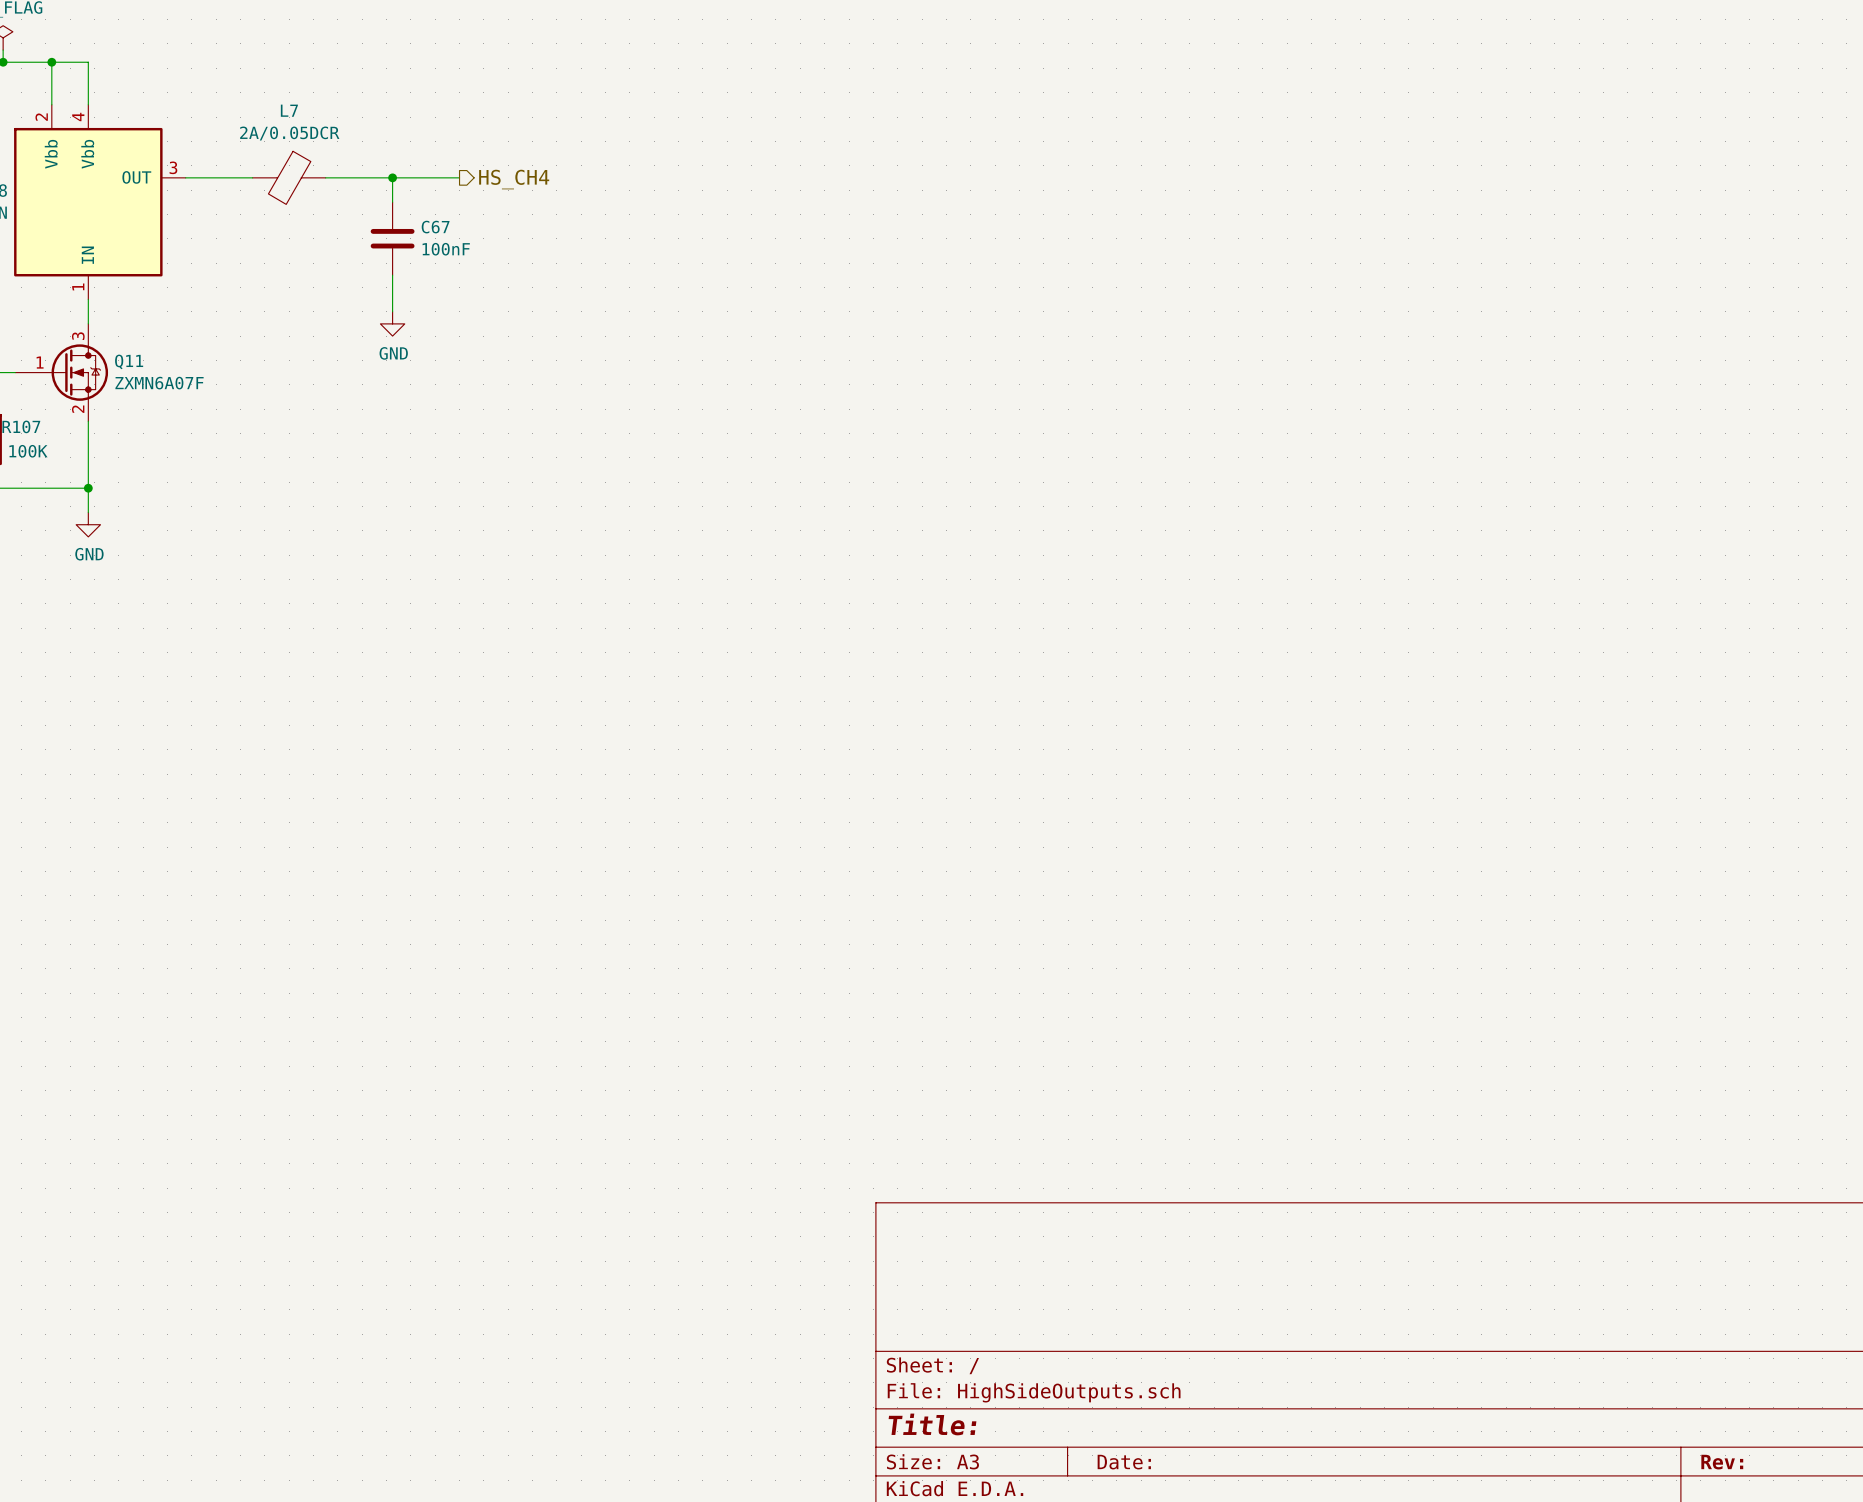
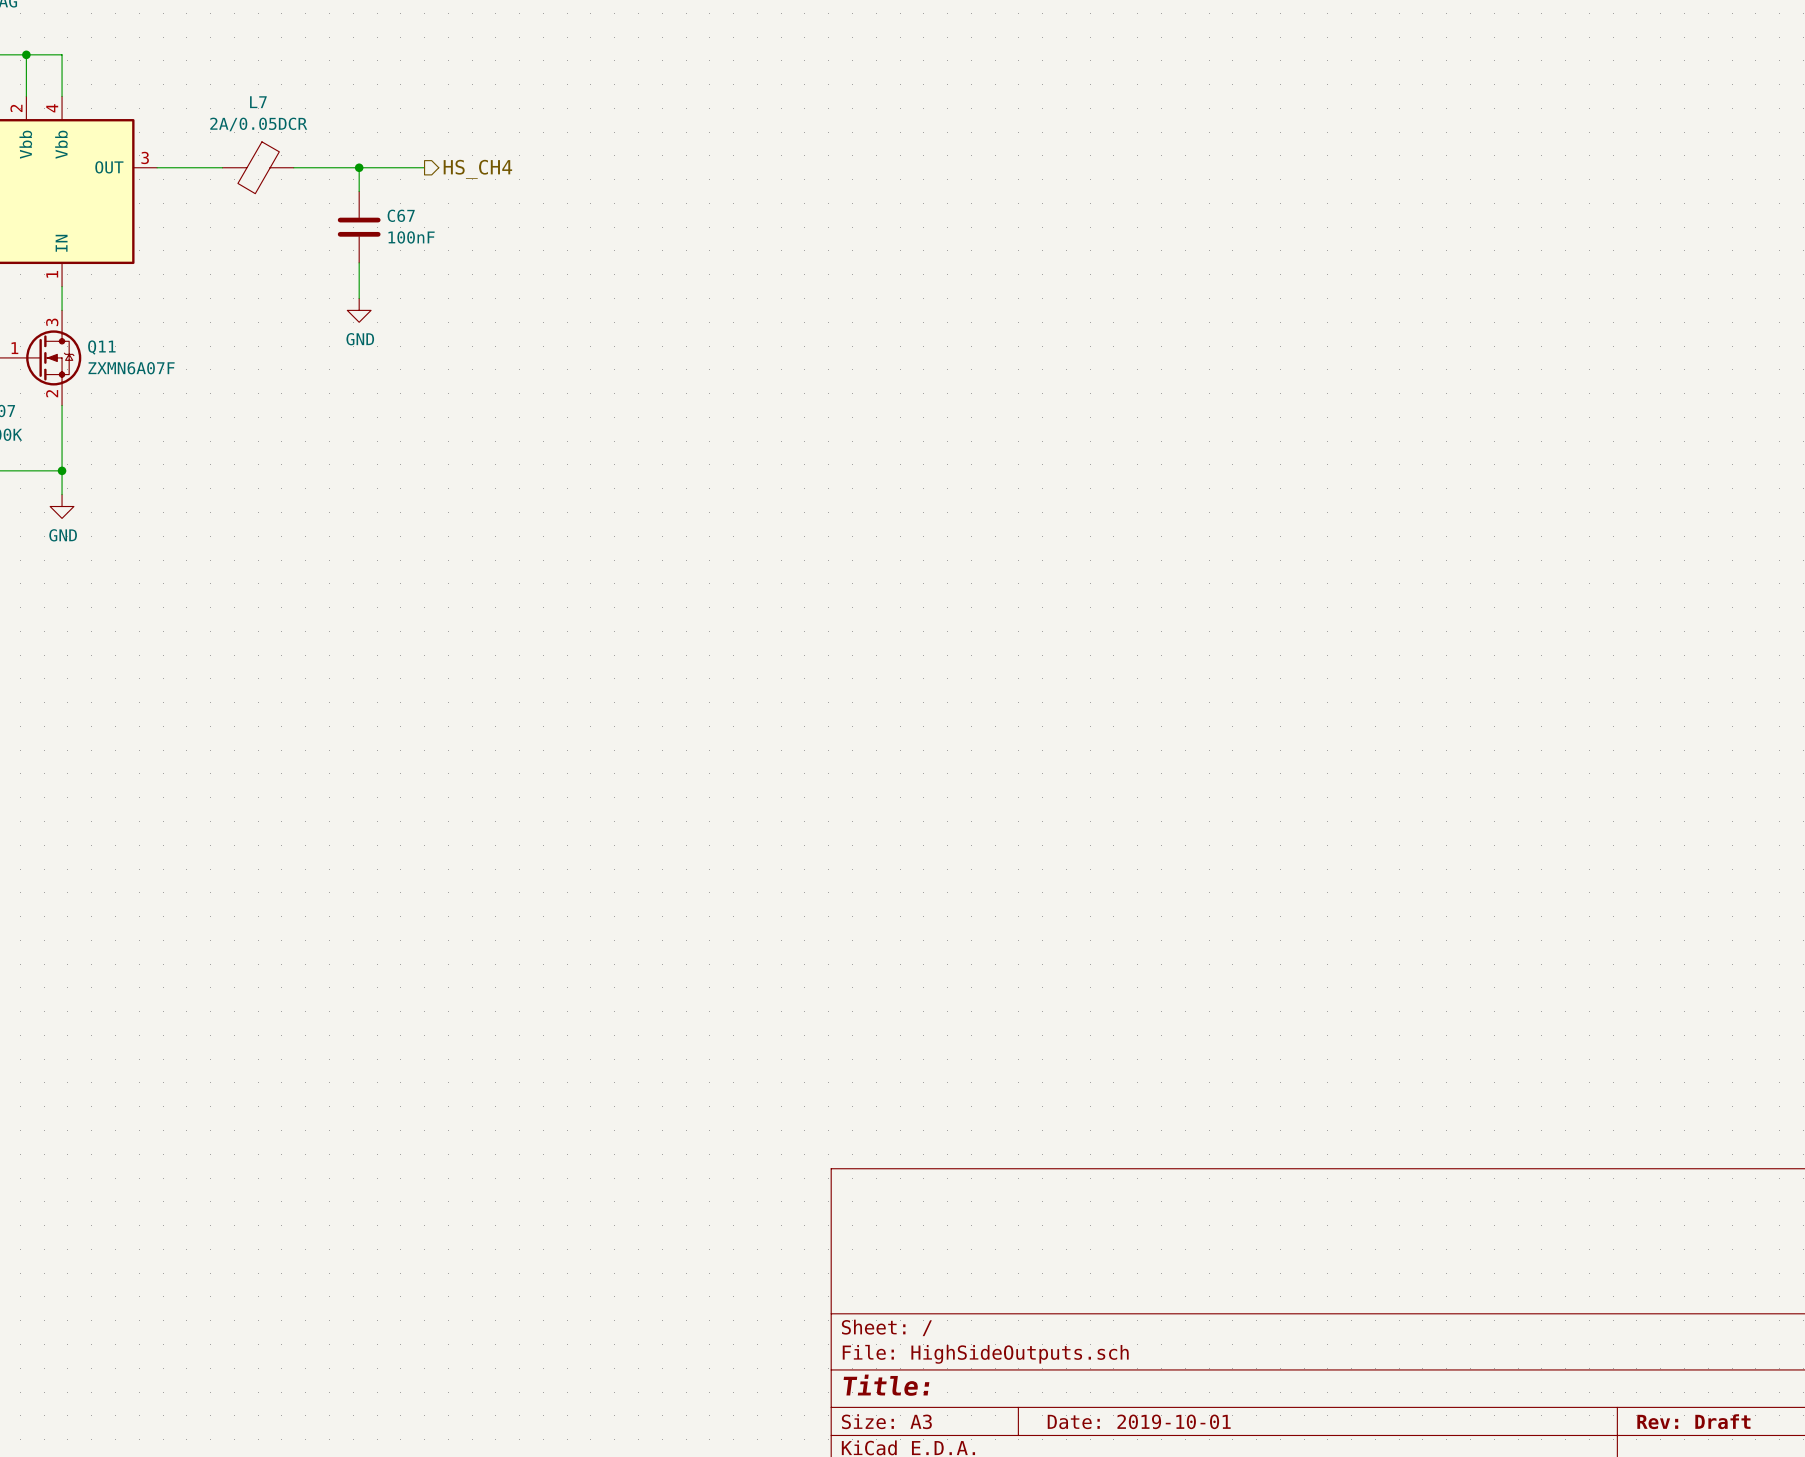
title block: Date: (1124, 1462) -> Date: 2019-10-01 (1139, 1421)
title block: Rev: (1722, 1462) -> Rev: Draft (1693, 1421)

